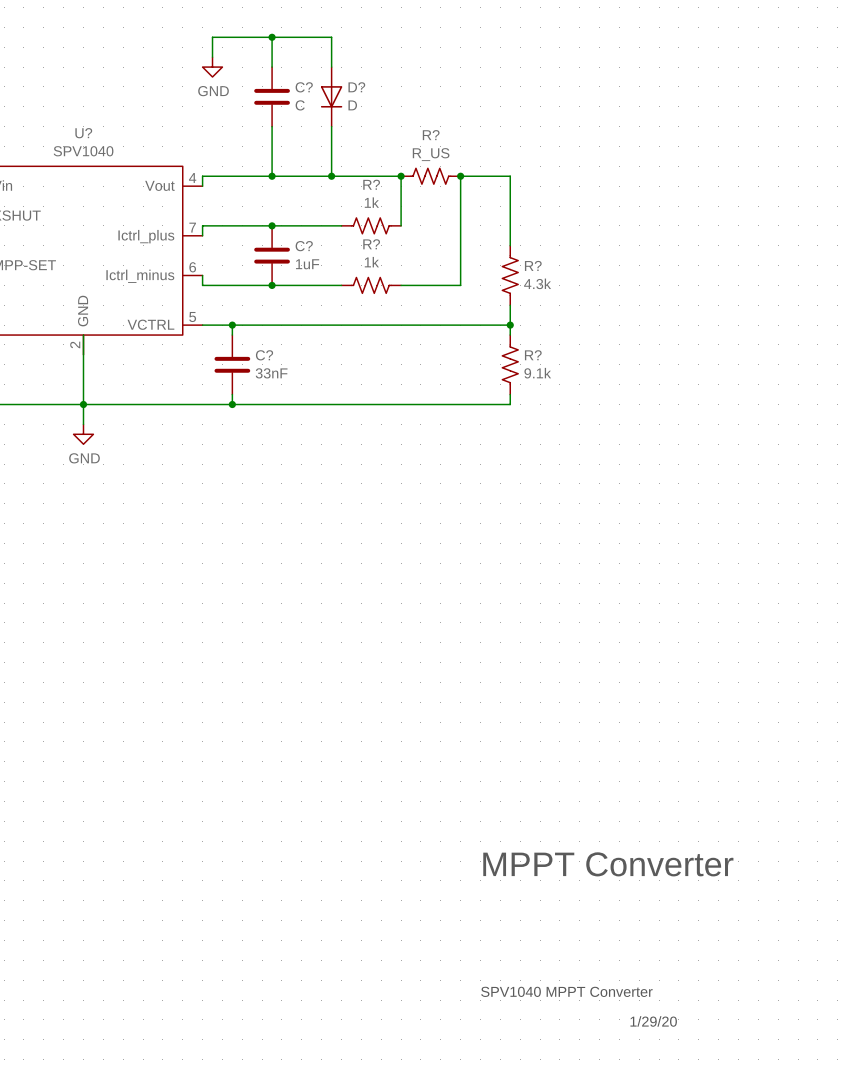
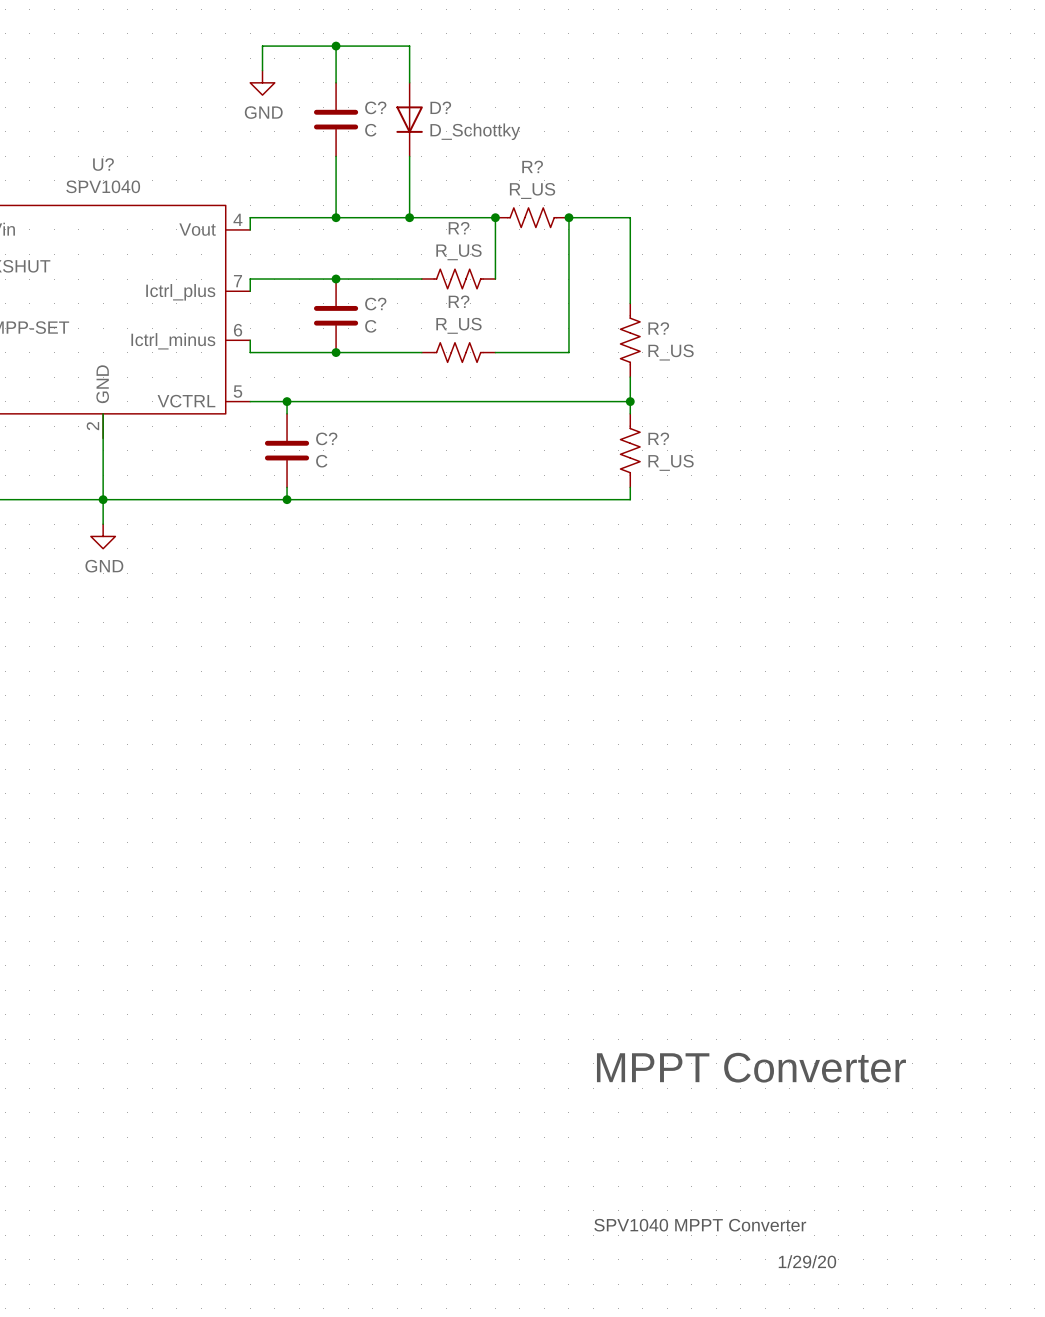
D? value: D (352, 105) -> D_Schottky (475, 131)
R? value: 1k (371, 202) -> R_US (458, 252)
R? value: 1k (371, 262) -> R_US (458, 325)
C? value: 1uF (307, 264) -> C (370, 326)
R? value: 4.3k (537, 283) -> R_US (671, 352)
C? value: 33nF (271, 373) -> C (321, 461)
R? value: 9.1k (537, 373) -> R_US (671, 462)

